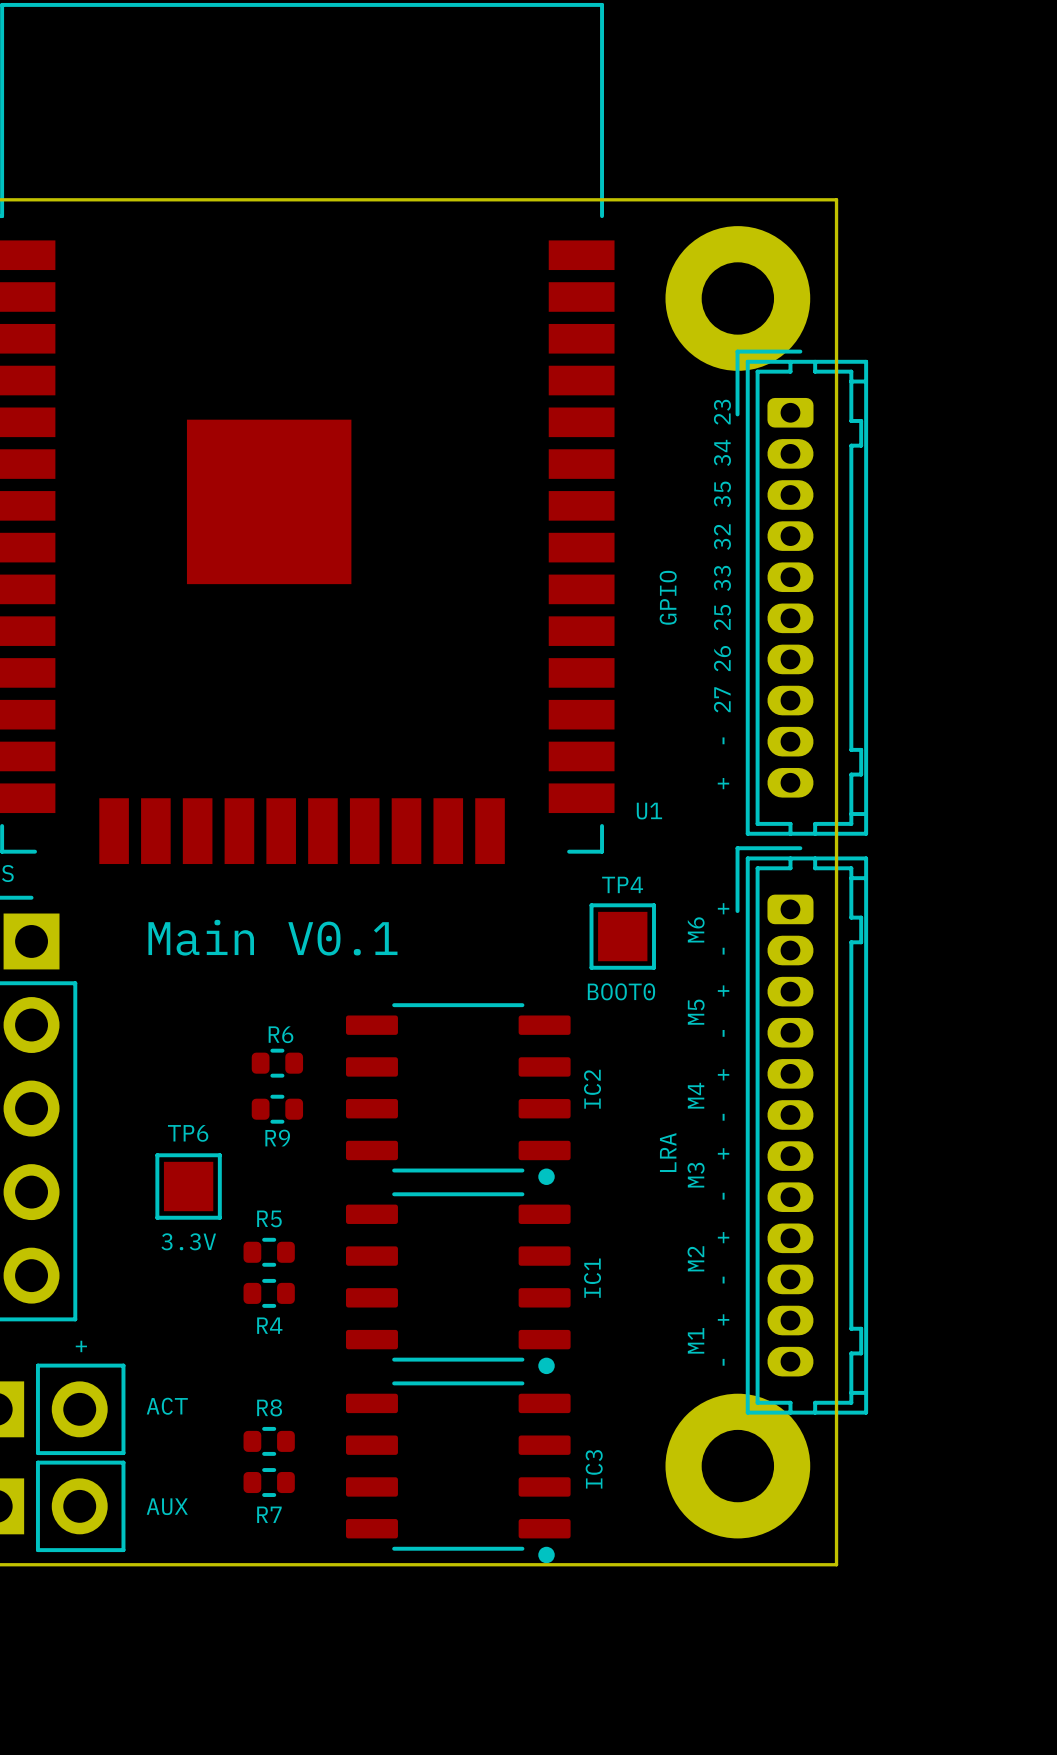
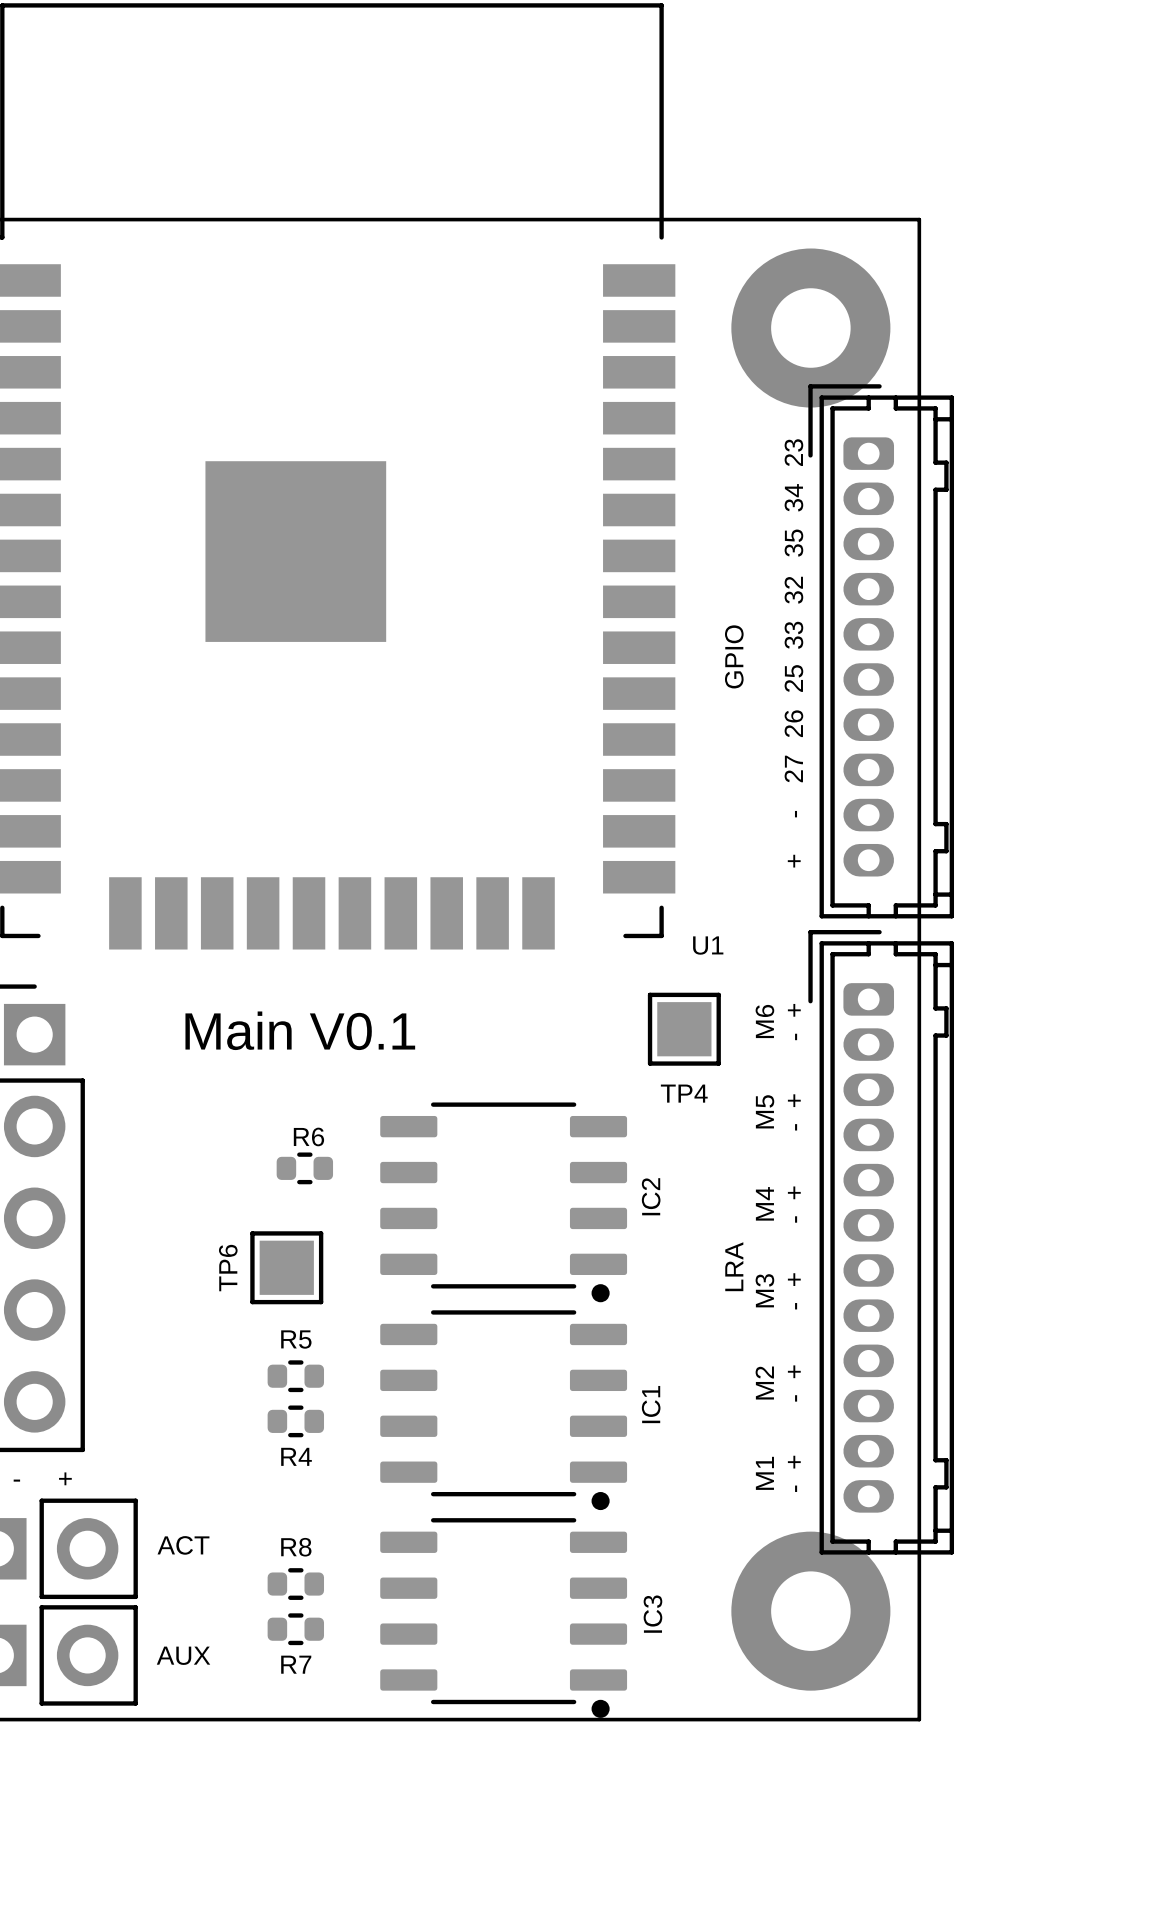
U1 name position: U1 (649, 811) -> U1 (708, 945)
TP4 name position: TP4 (622, 884) -> TP4 (684, 1093)
text: BOOT0 (621, 991) -> none
R9: (277, 1109) -> none
TP6 name rotation: 0° (188, 1133) -> 90° counterclockwise (228, 1268)
TP6 position: (188, 1186) -> (286, 1267)
text: 3.3V (188, 1241) -> none

